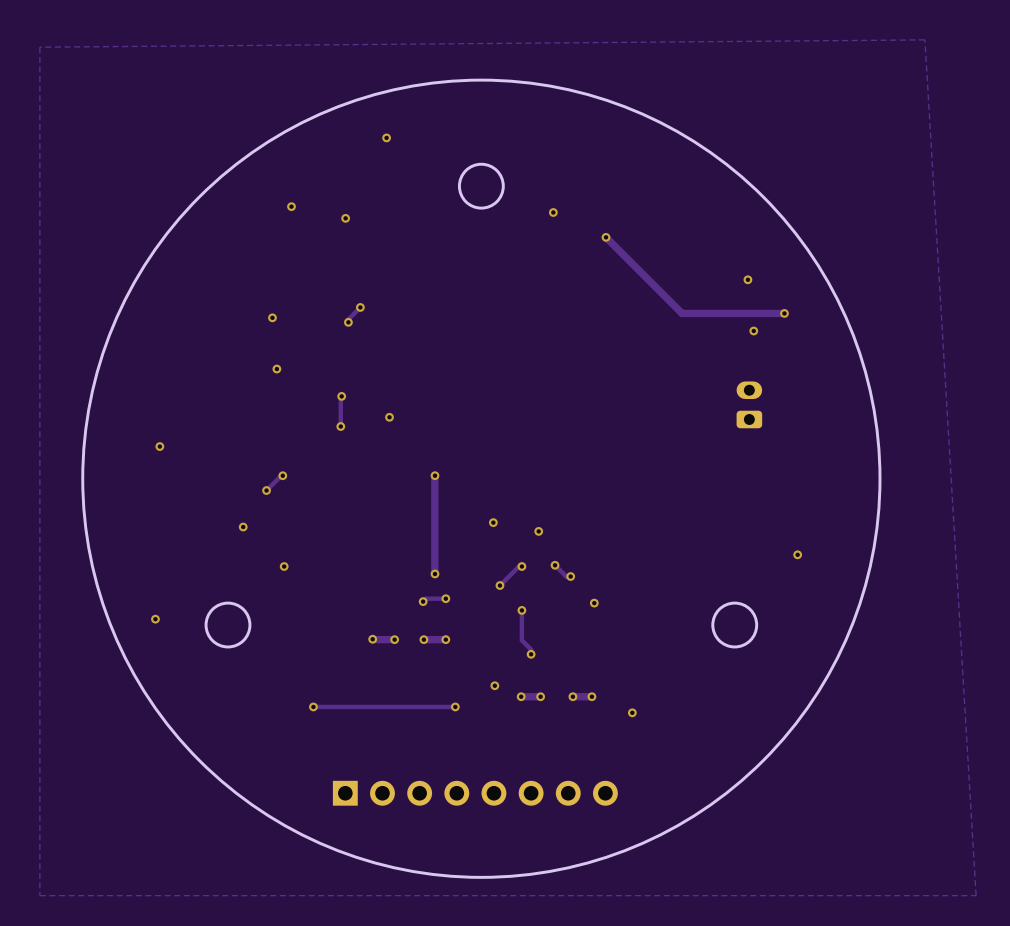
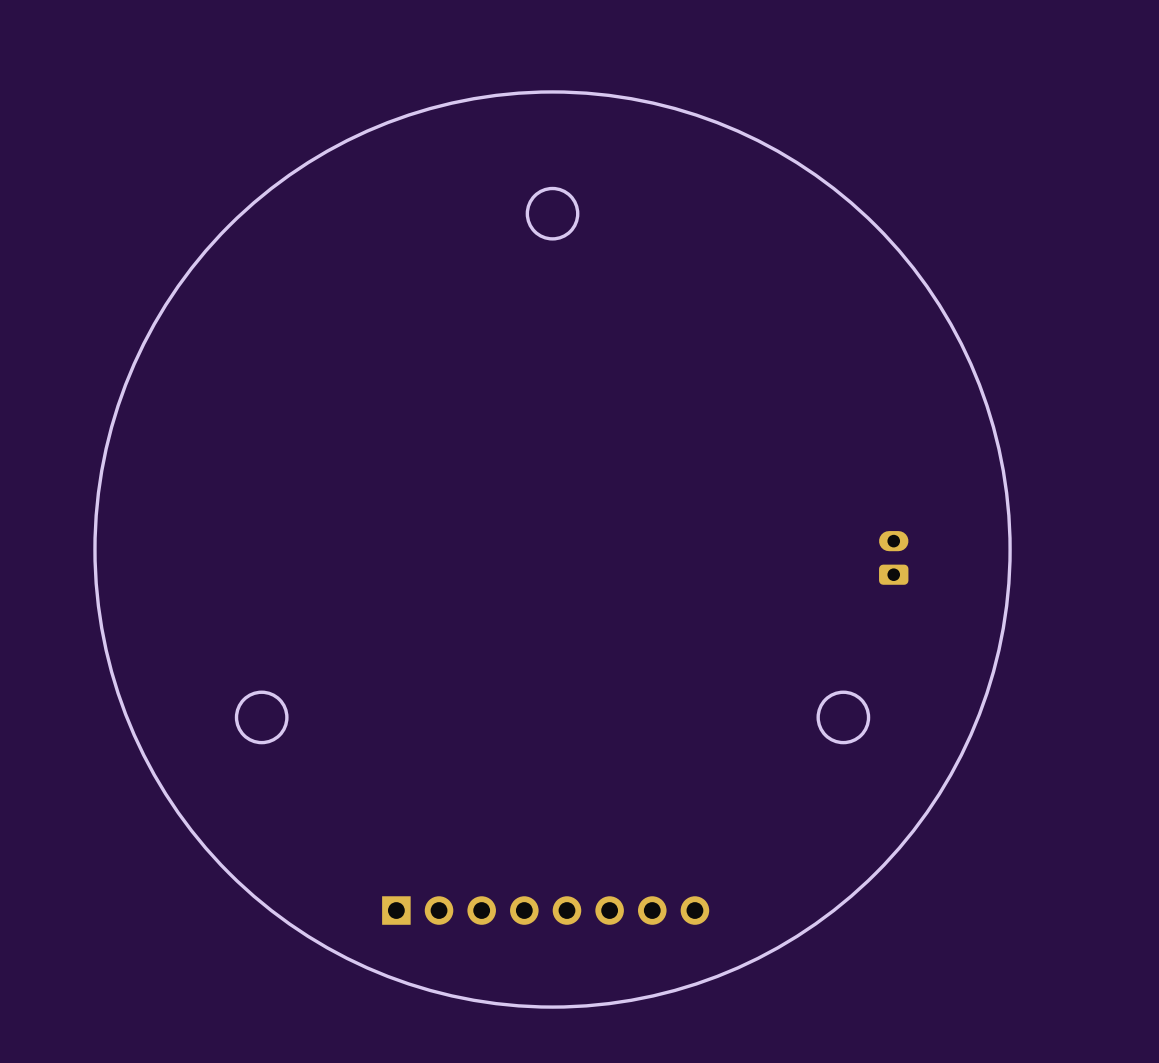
zone outline: (924, 39) (39, 47) (39, 895) (976, 895) (924, 39) -> none
via: (386, 137) -> none
via: (291, 206) -> none
via: (553, 212) -> none
via: (345, 218) -> none
track: (606, 237) (682, 313) (784, 313) -> none
via: (606, 237) -> none
via: (747, 279) -> none
track: (360, 307) (348, 319) (348, 322) -> none
via: (360, 307) -> none
via: (784, 313) -> none
via: (272, 317) -> none
via: (348, 322) -> none
via: (753, 330) -> none
via: (276, 369) -> none
track: (341, 396) (340, 426) -> none
via: (341, 396) -> none
part position: (749, 404) -> (893, 557)
via: (389, 417) -> none
via: (340, 426) -> none
via: (159, 446) -> none
track: (282, 475) (266, 490) -> none
via: (282, 475) -> none
track: (434, 475) (434, 573) -> none
via: (435, 475) -> none
via: (266, 490) -> none
via: (493, 522) -> none
via: (243, 527) -> none
via: (538, 531) -> none
via: (797, 554) -> none
track: (555, 565) (566, 576) (570, 576) -> none
via: (555, 565) -> none
via: (284, 566) -> none
track: (521, 566) (518, 566) (499, 585) -> none
via: (521, 566) -> none
via: (435, 573) -> none
via: (570, 576) -> none
via: (499, 585) -> none
track: (445, 598) (426, 598) (423, 601) -> none
via: (445, 598) -> none
via: (423, 601) -> none
via: (594, 603) -> none
track: (521, 610) (521, 640) (531, 649) (531, 654) -> none
via: (521, 610) -> none
via: (155, 619) -> none
track: (372, 639) (394, 639) -> none
via: (372, 639) -> none
via: (394, 639) -> none
via: (423, 639) -> none
track: (445, 639) (423, 639) -> none
via: (445, 639) -> none
via: (531, 654) -> none
via: (494, 685) -> none
via: (521, 696) -> none
track: (540, 696) (521, 696) -> none
via: (540, 696) -> none
via: (572, 696) -> none
track: (591, 696) (572, 696) -> none
via: (591, 696) -> none
via: (313, 706) -> none
track: (455, 706) (313, 706) -> none
via: (455, 706) -> none
via: (632, 712) -> none

